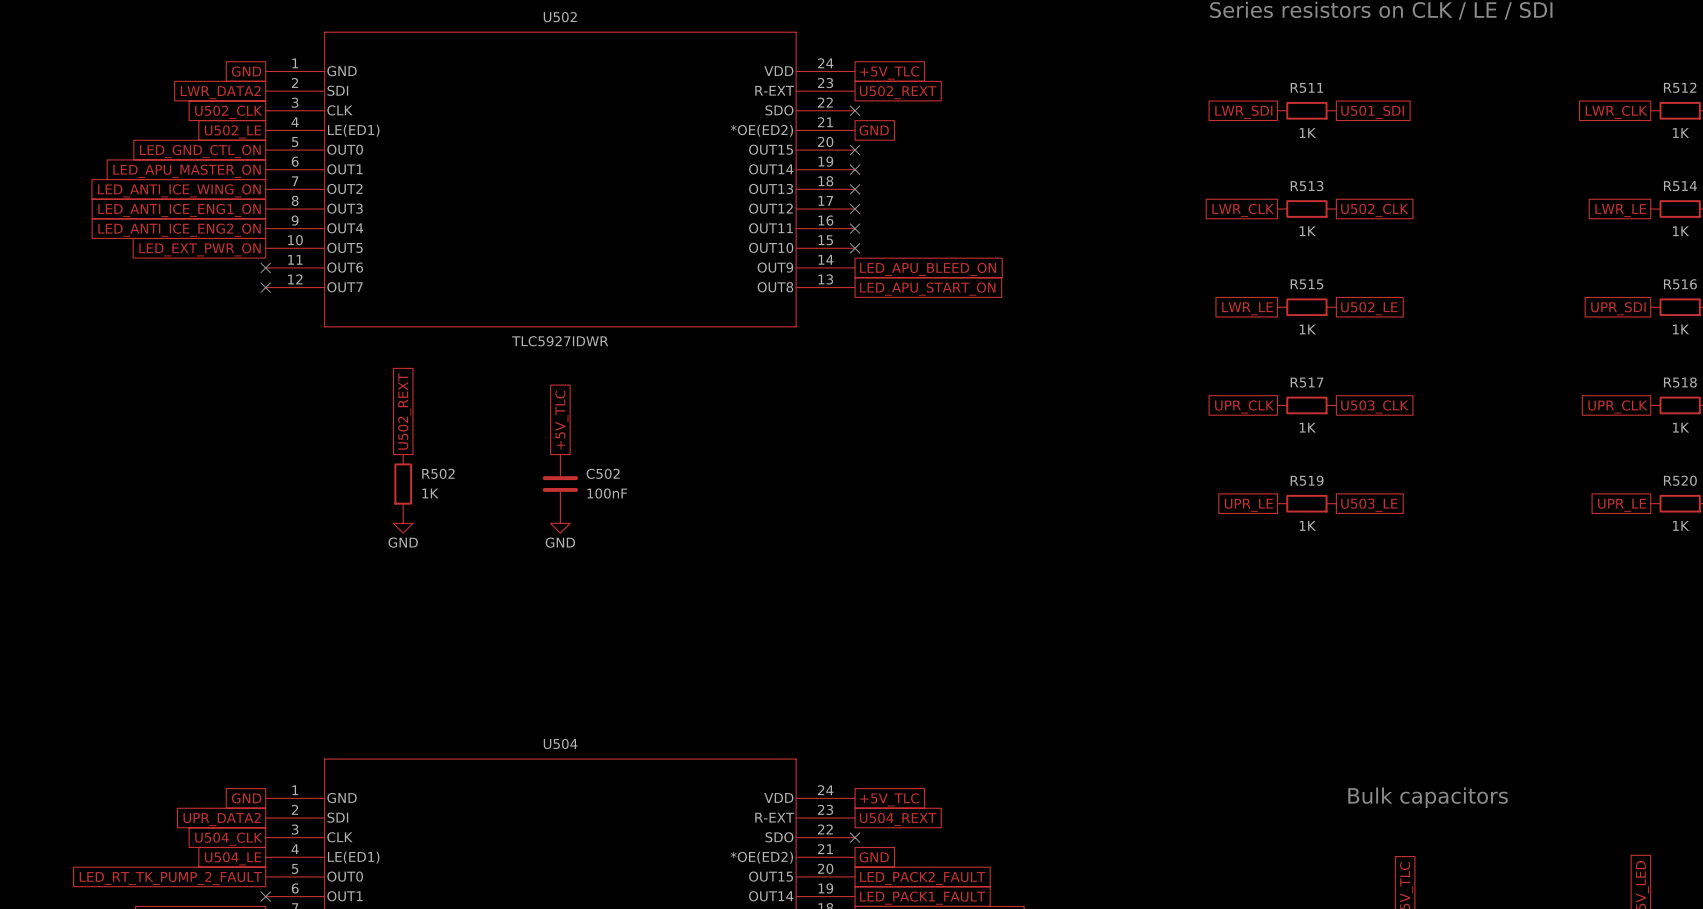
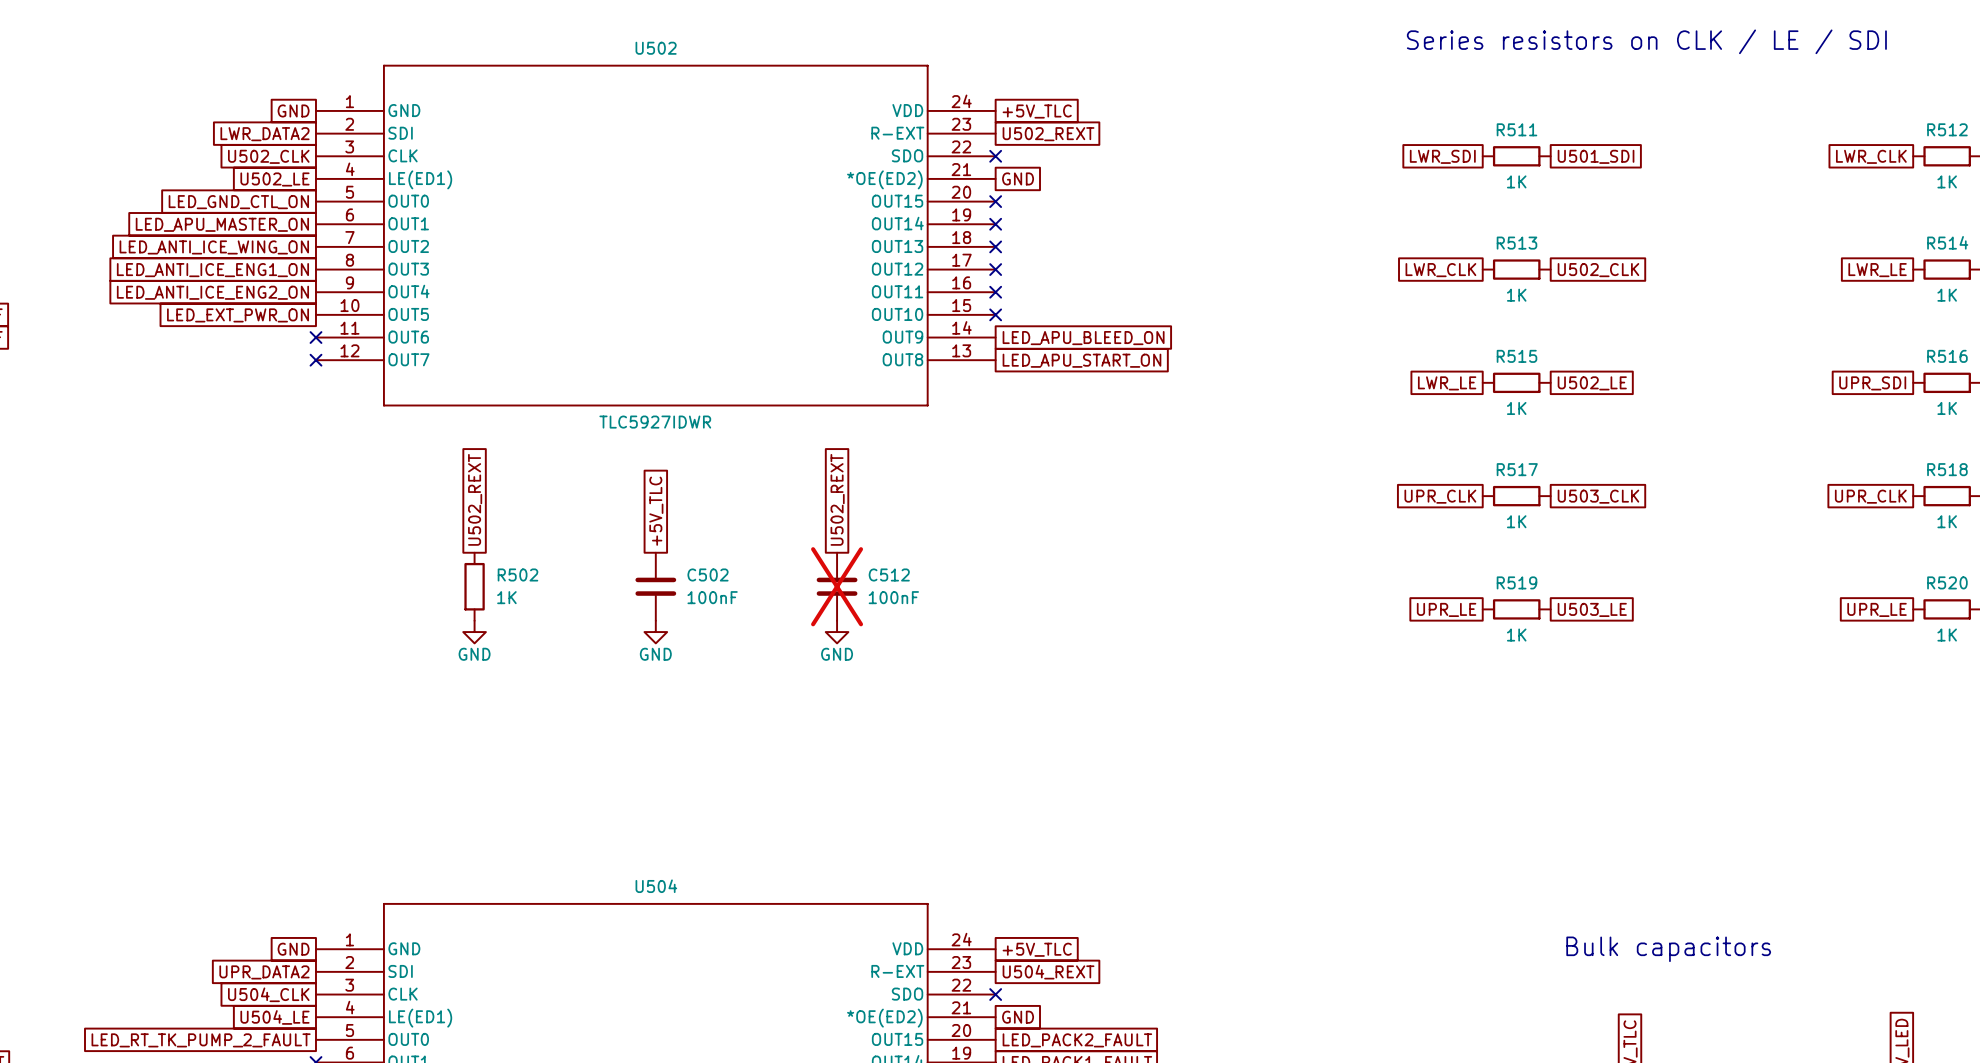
global label: none -> U502_REXT (837, 499)
C512: none -> 100nF (837, 586)
power symbol: none -> GND (837, 632)

